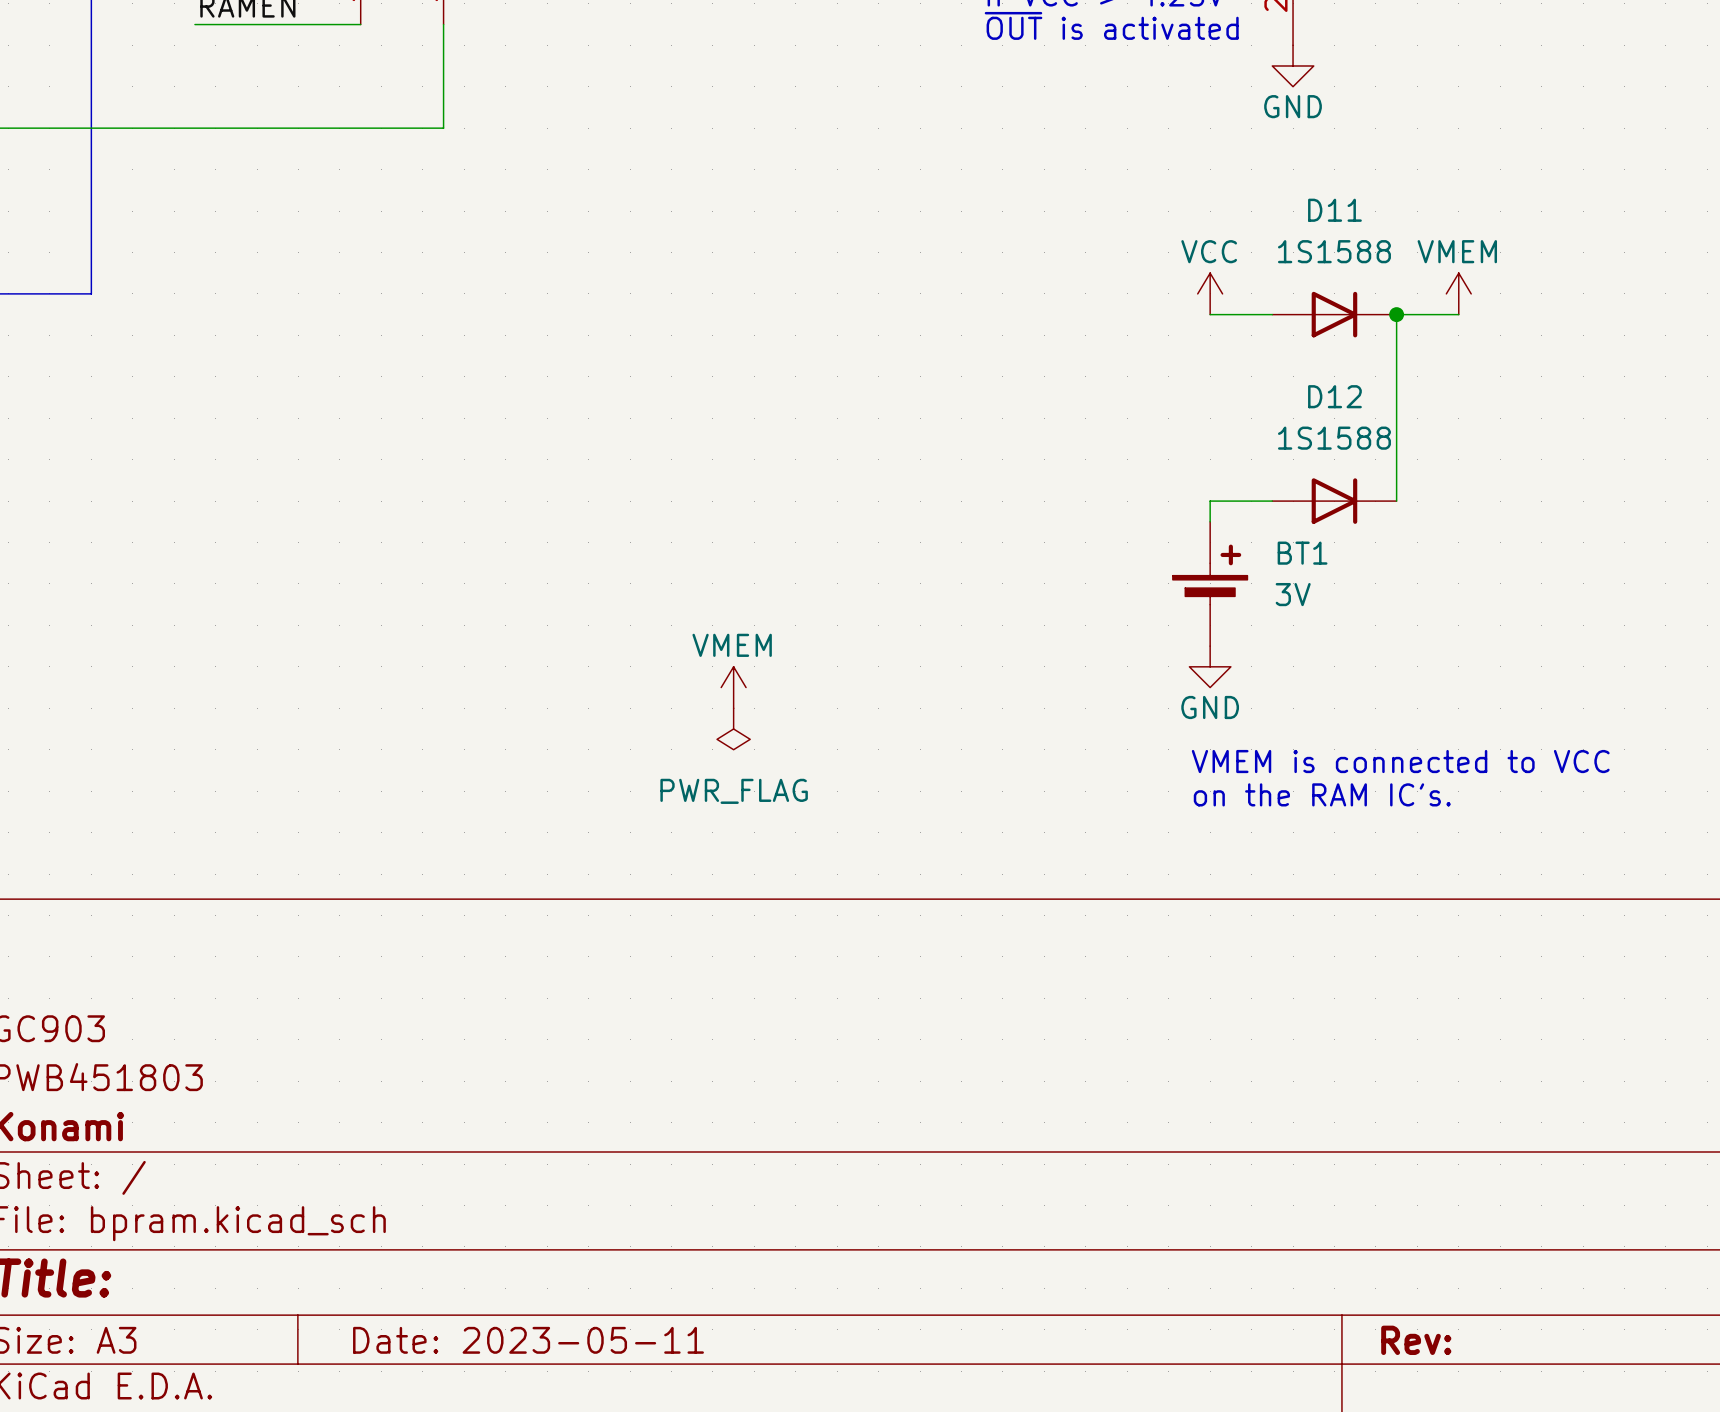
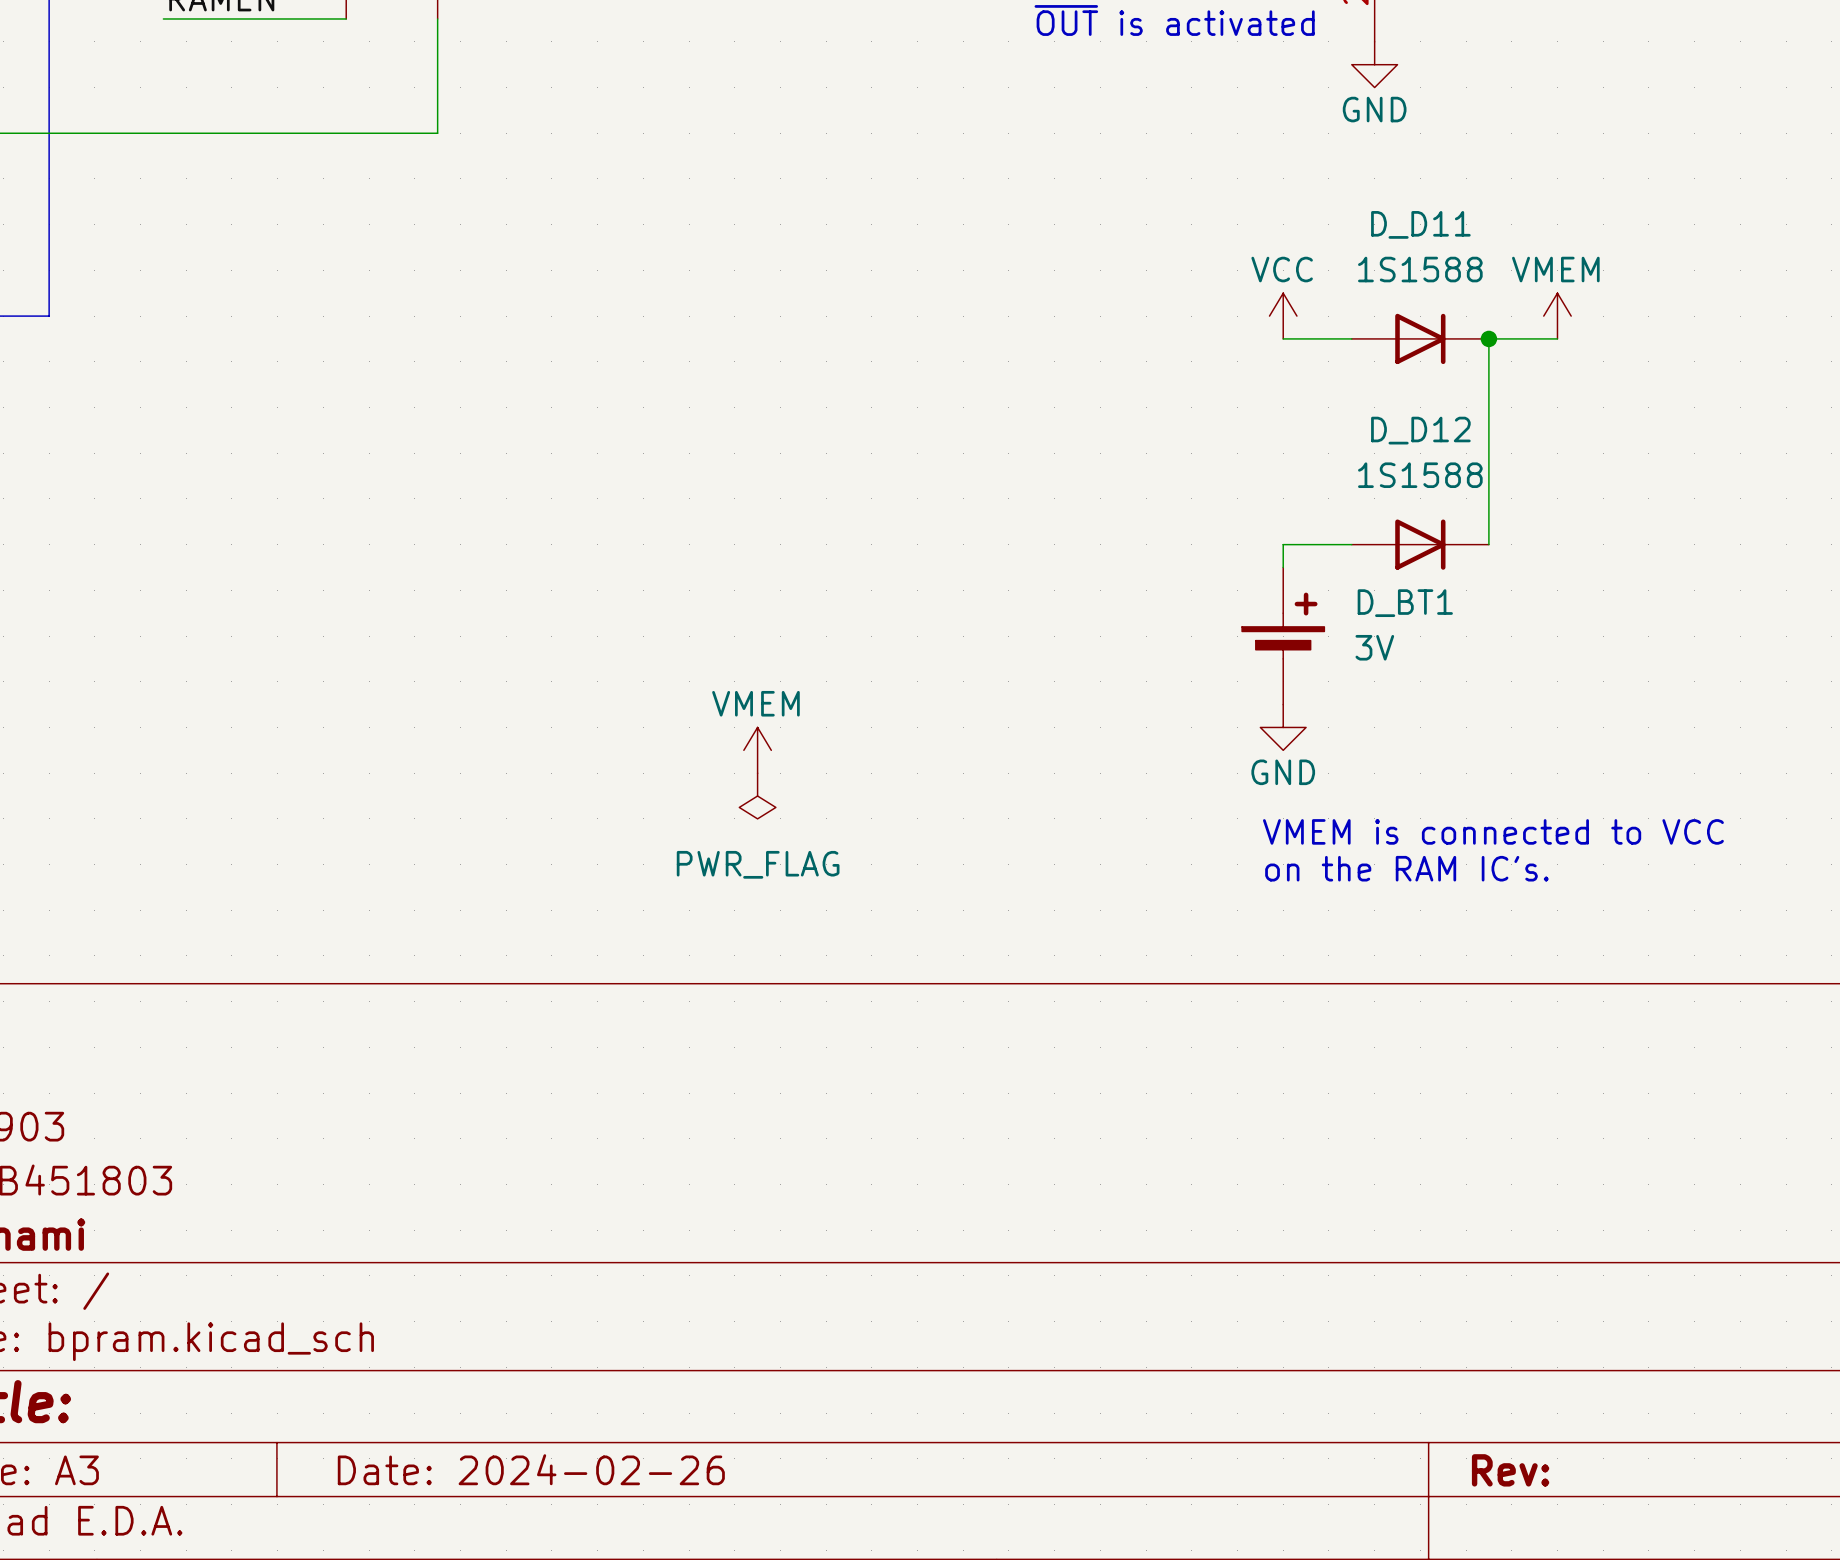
D11 name: D11 (1334, 210) -> D_D11 (1420, 224)
D12 name: D12 (1334, 396) -> D_D12 (1420, 430)
BT1 name: BT1 (1302, 553) -> D_BT1 (1405, 603)
title block: Date: 2023-05-11 (528, 1340) -> Date: 2024-02-26 (531, 1469)

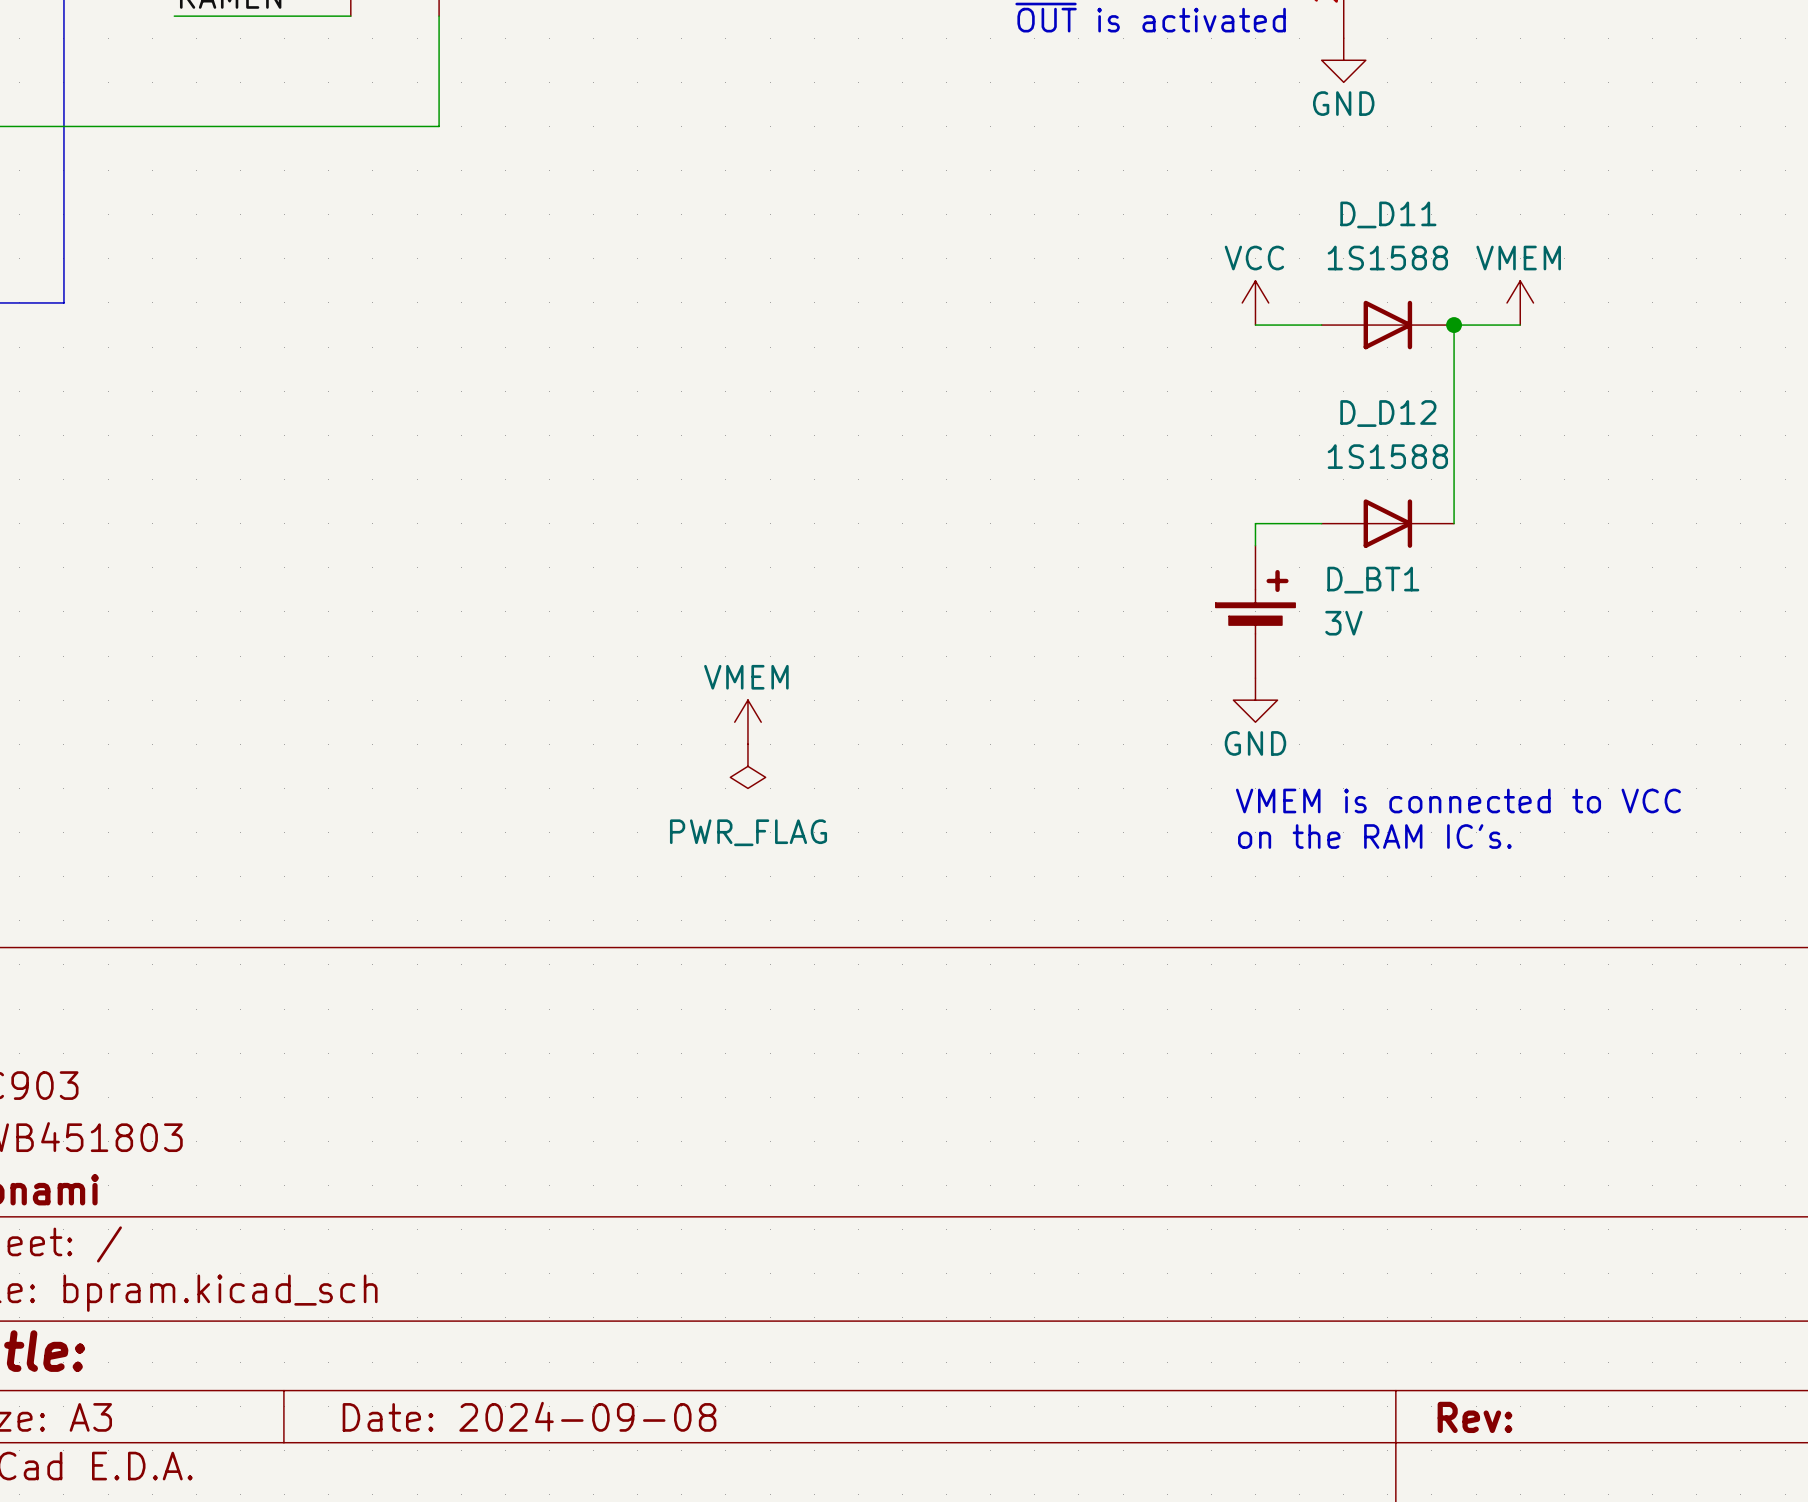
title block: Date: 2024-02-26 (531, 1469) -> Date: 2024-09-08 (529, 1416)

